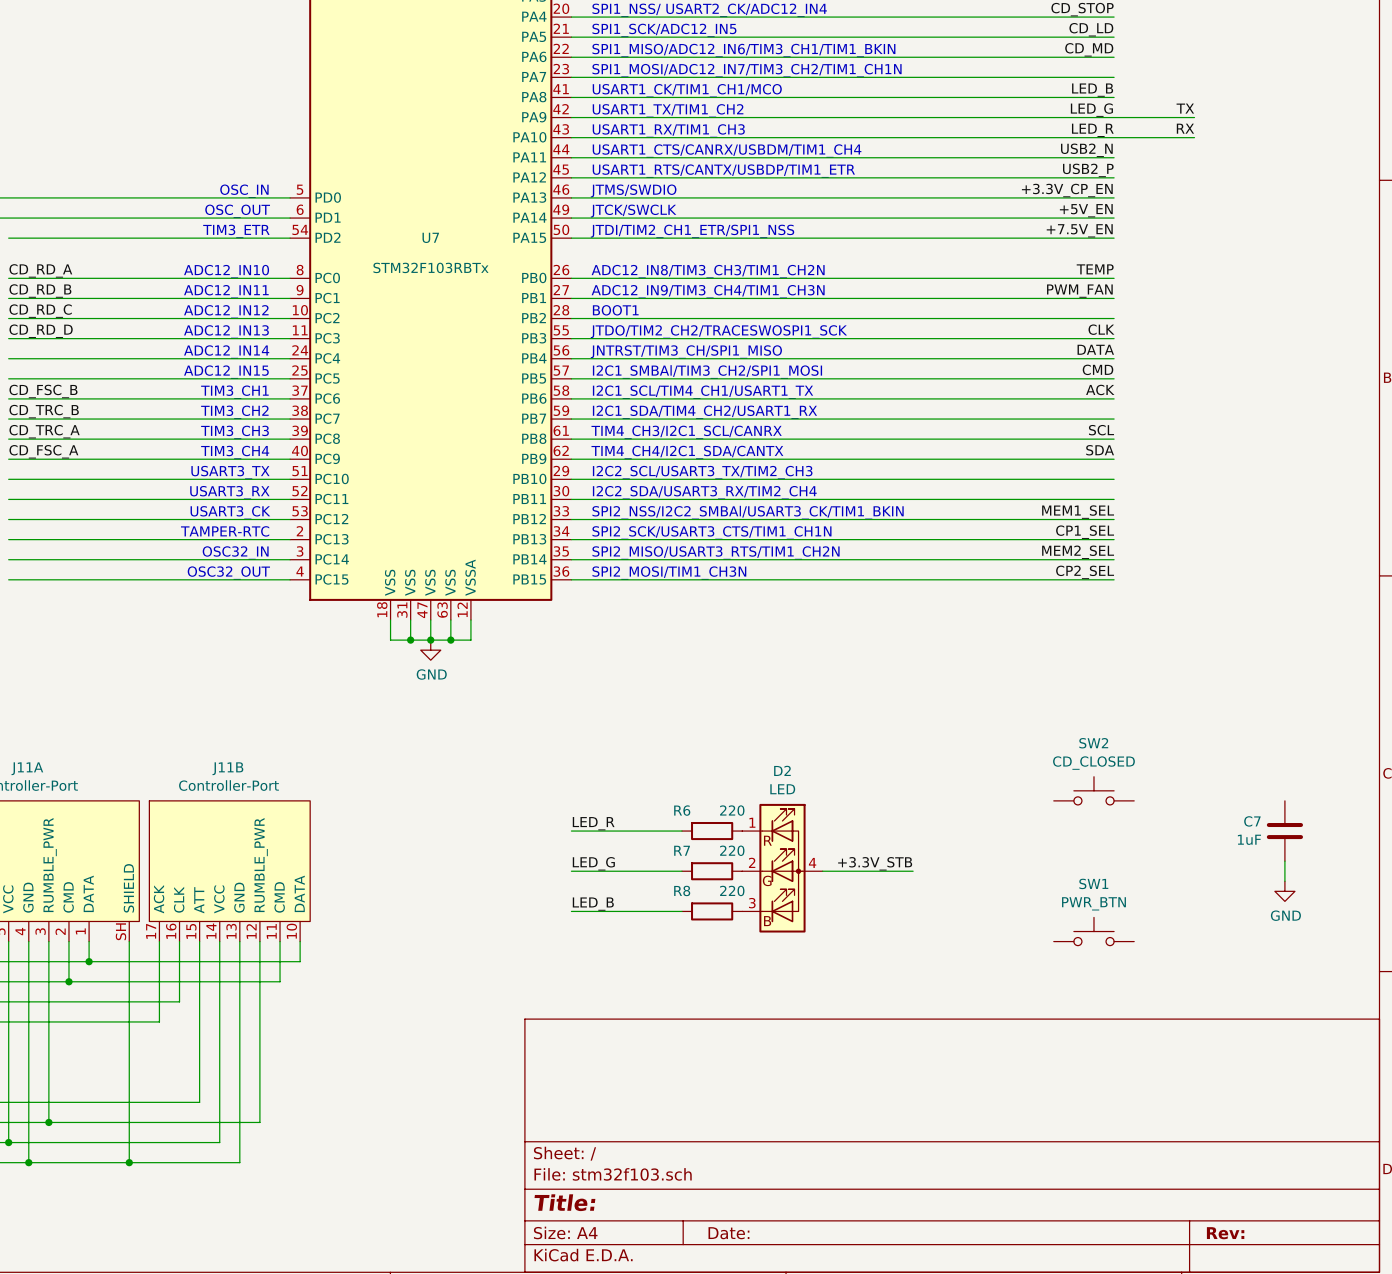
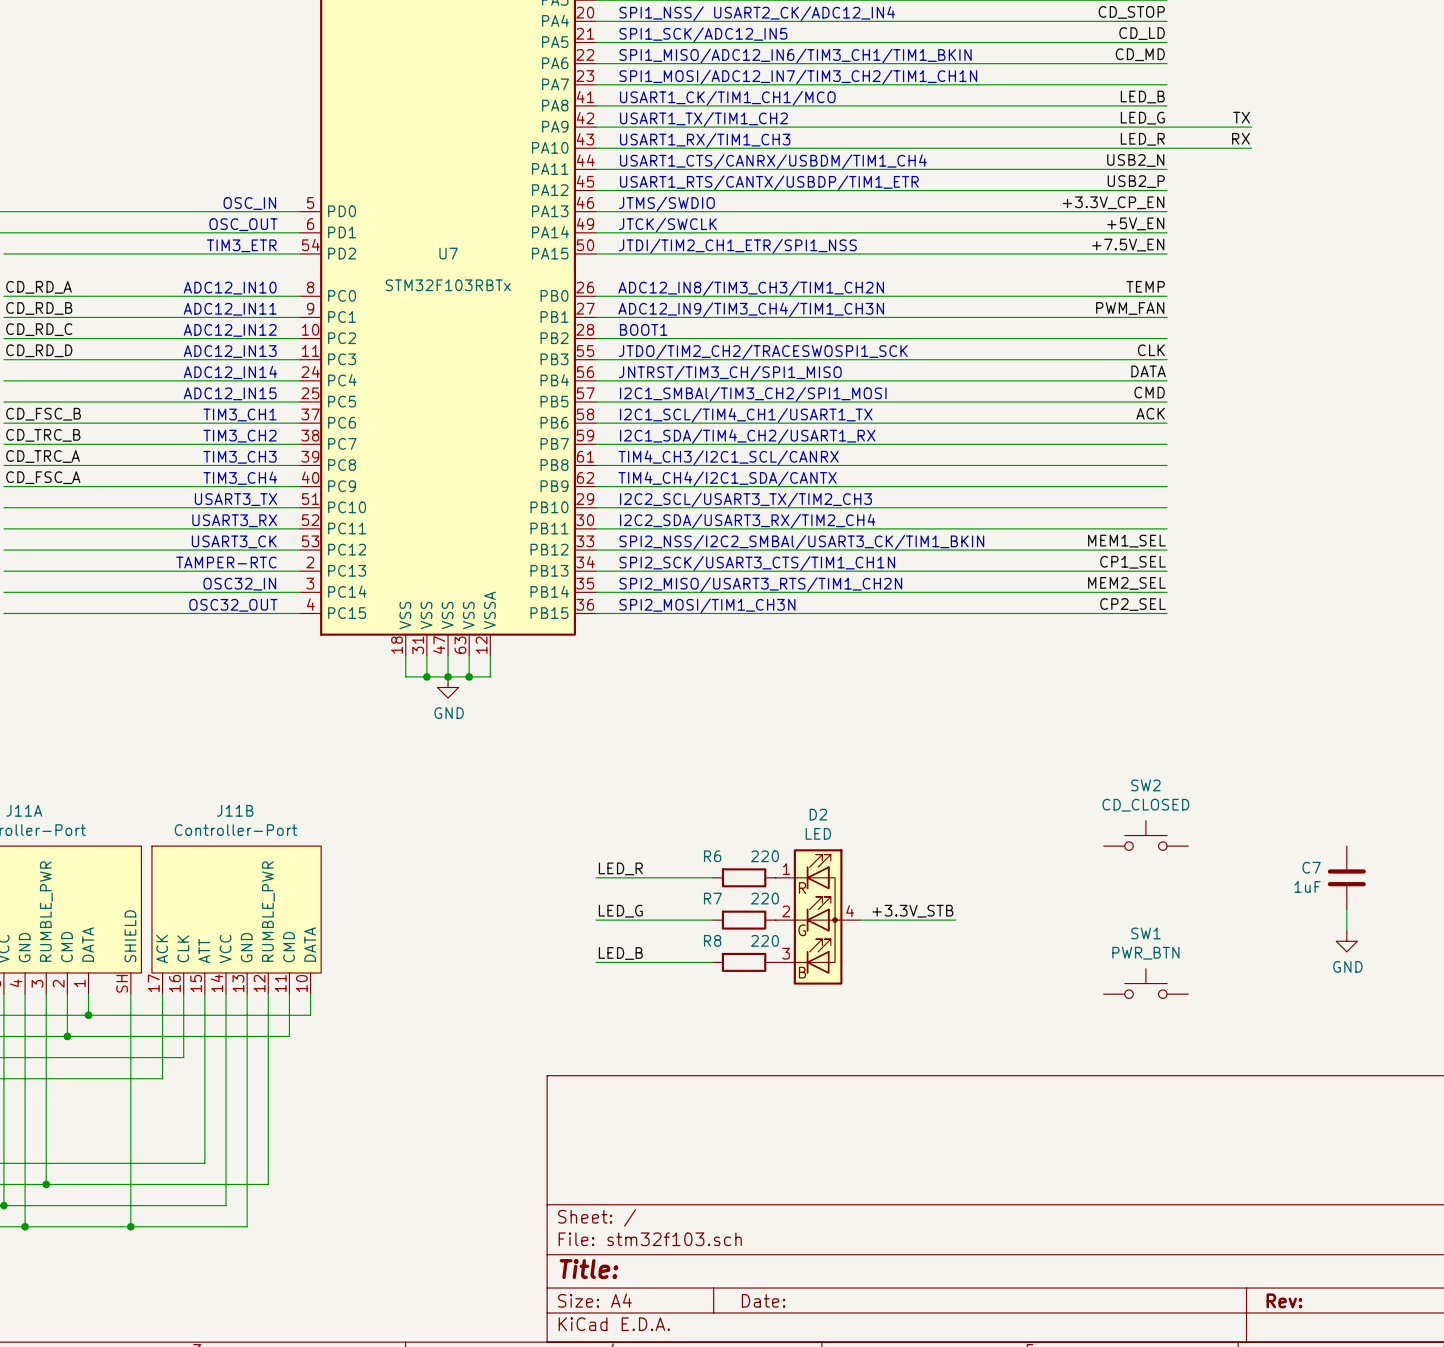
label: SCL (1101, 430) -> none
label: SDA (1100, 450) -> none

